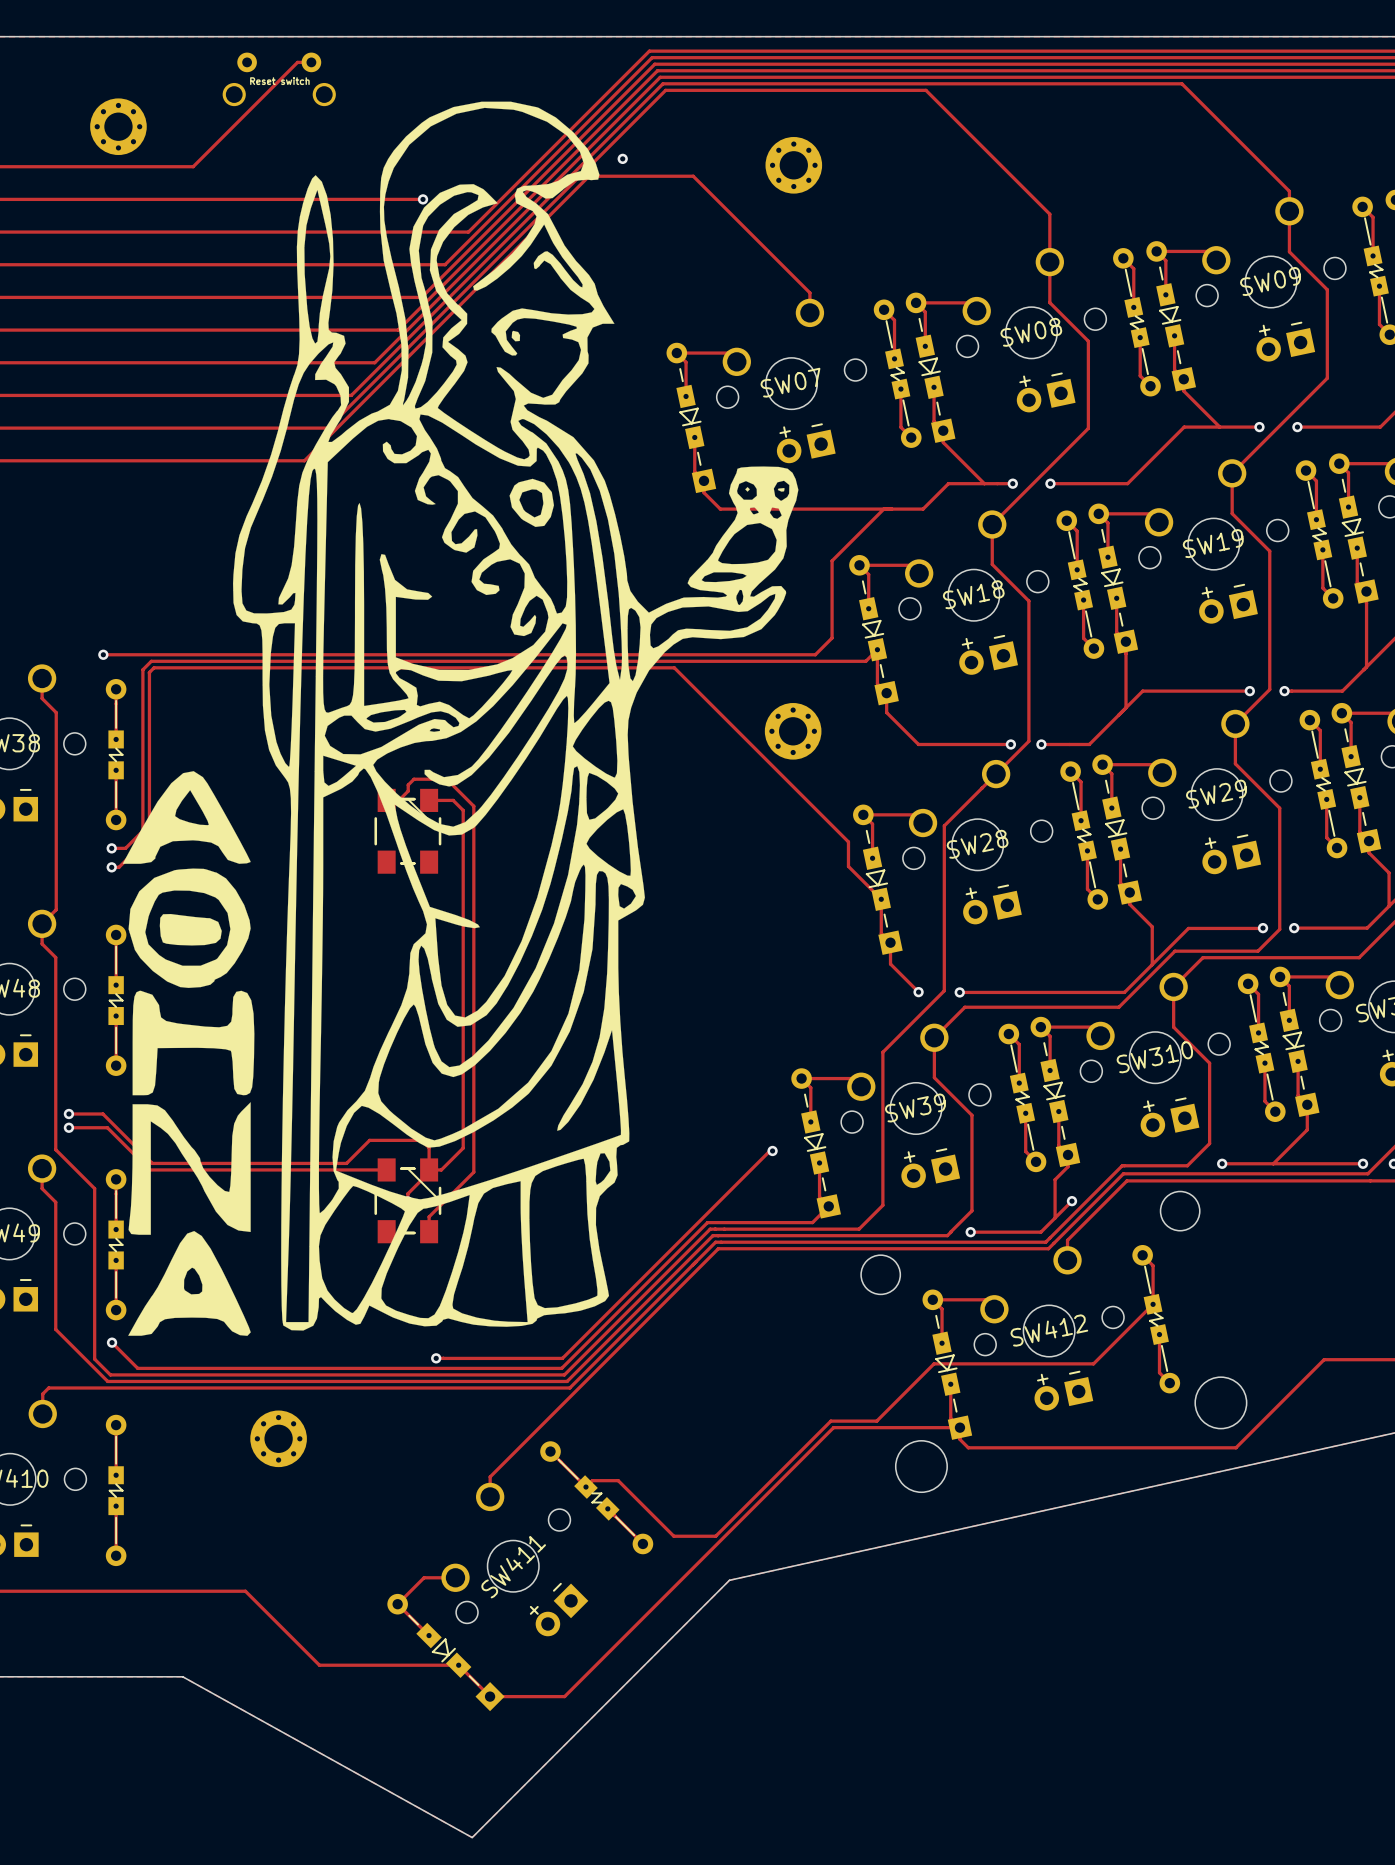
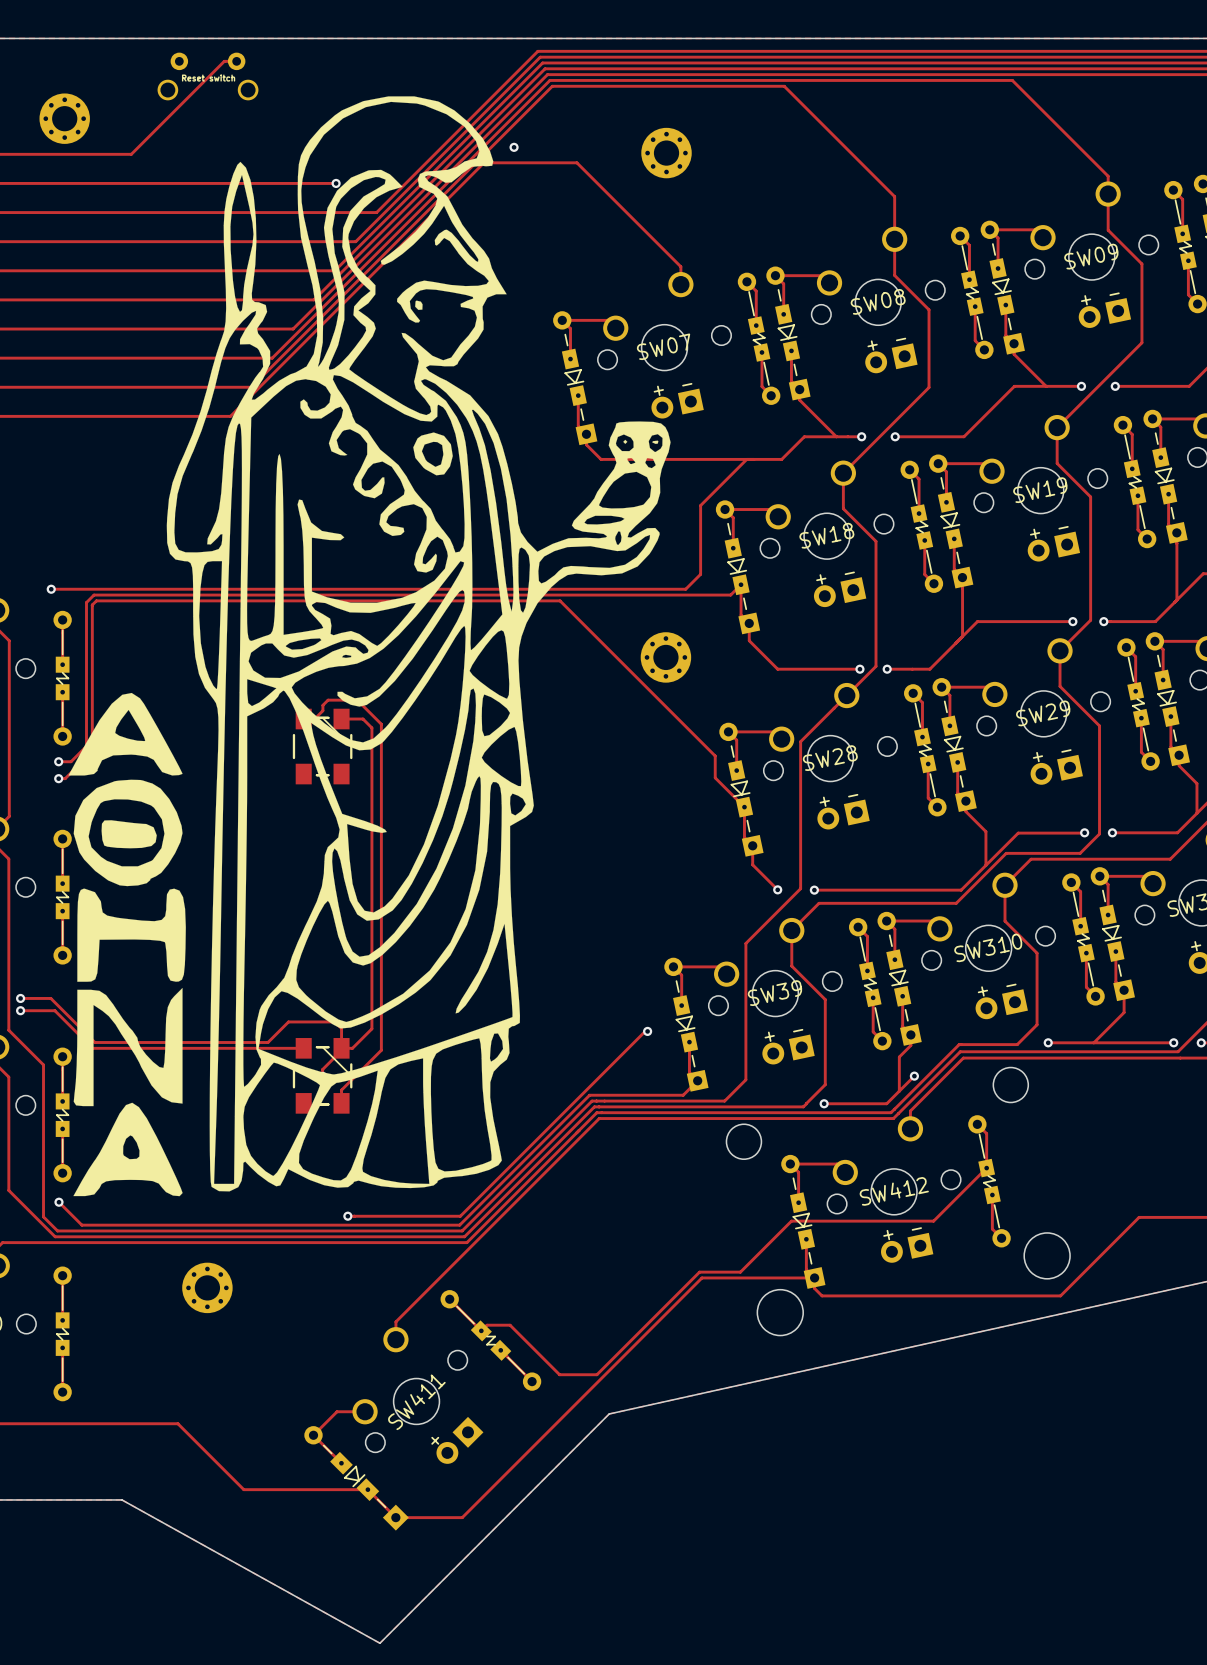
SW411 text: - (557, 1587) -> none

